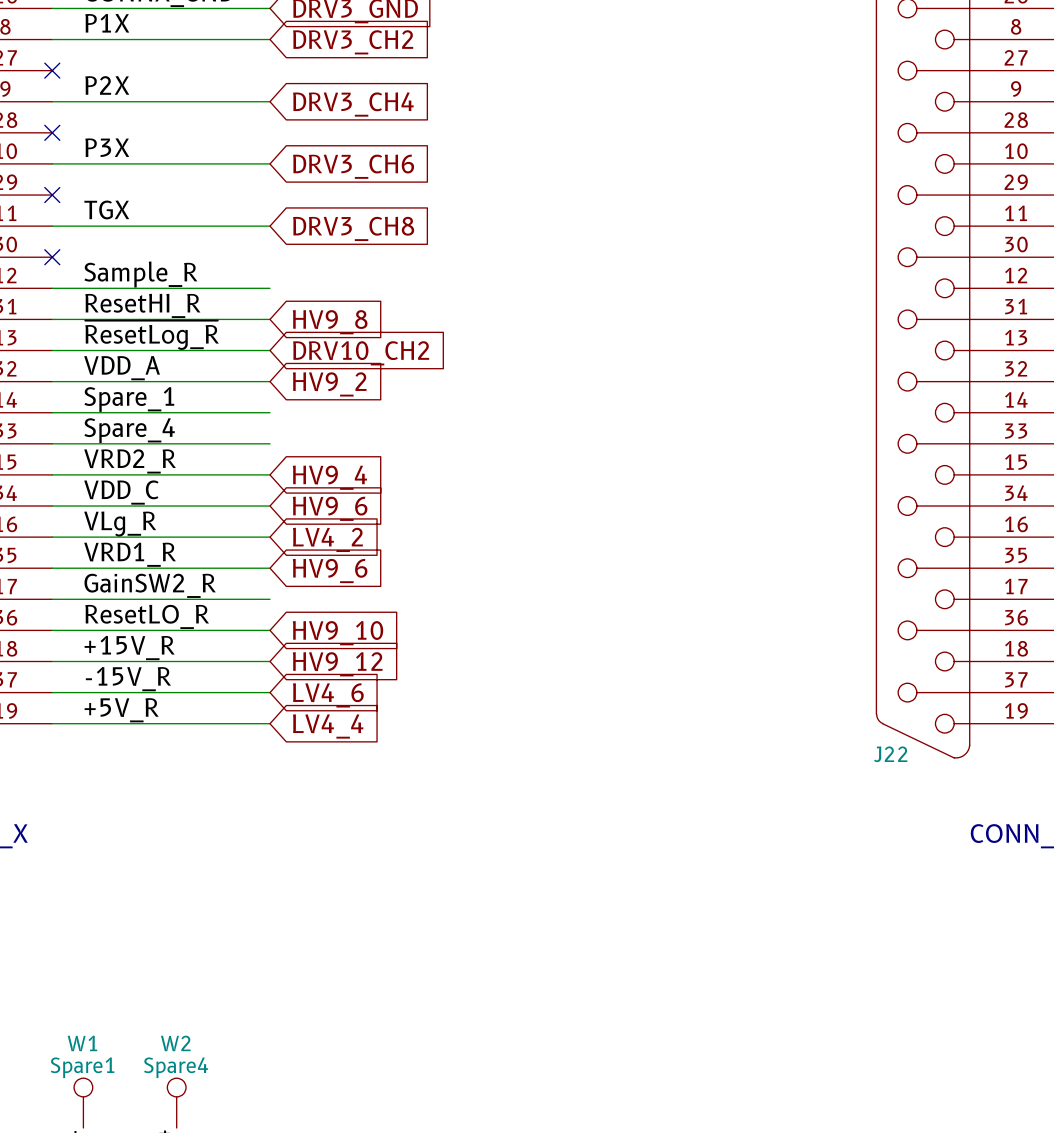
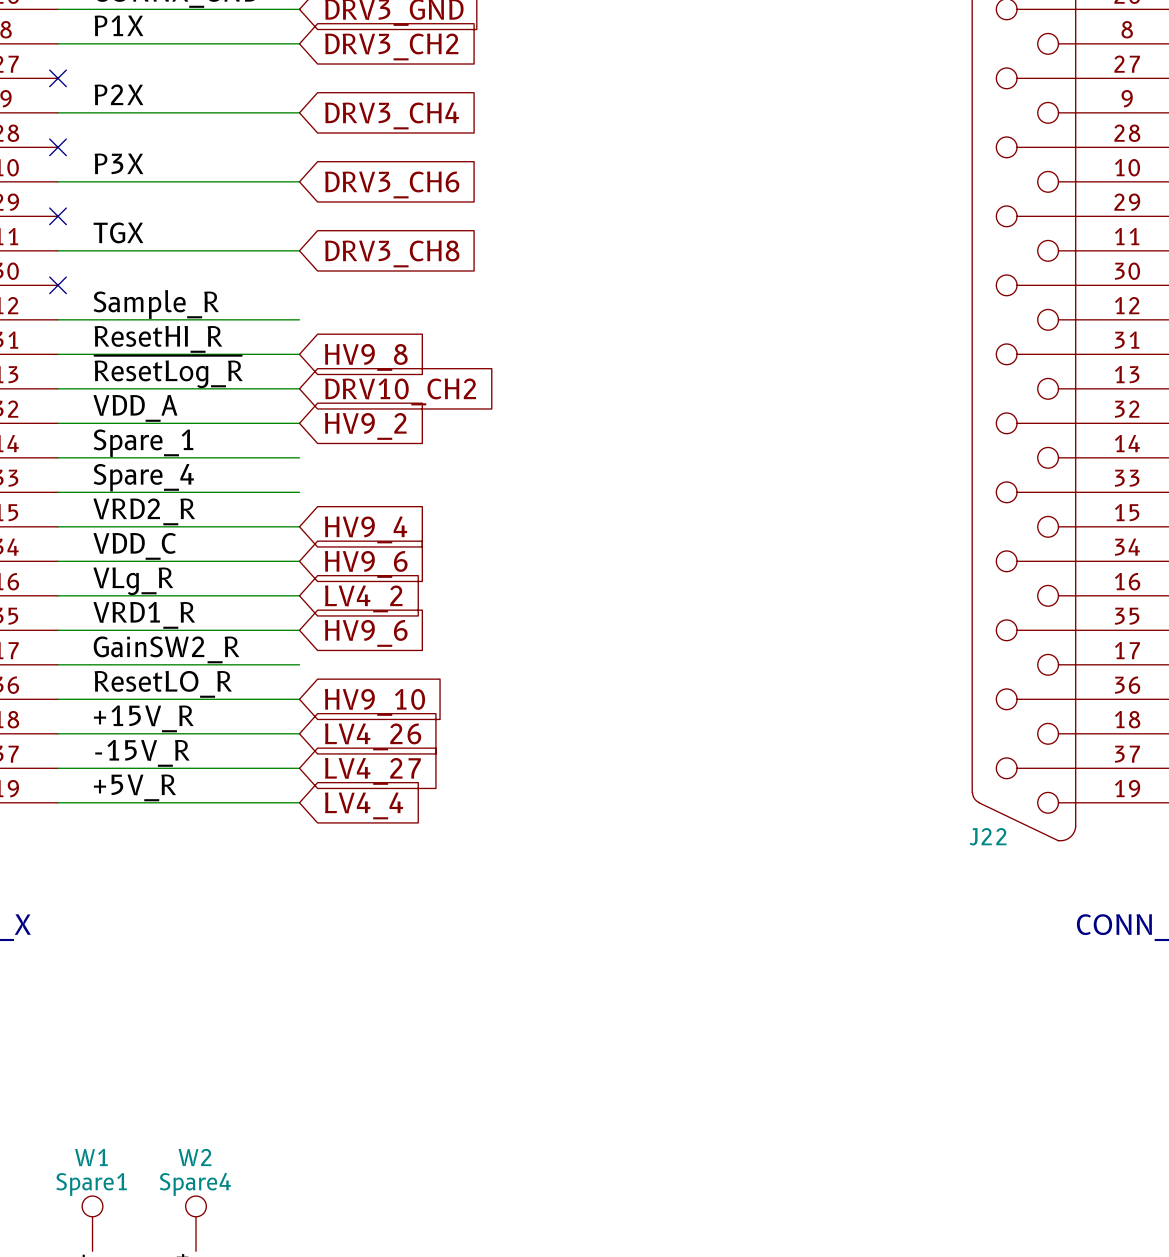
global label: HV9_12 (337, 664) -> LV4_26 (373, 736)
global label: LV4_6 (328, 695) -> LV4_27 (372, 771)

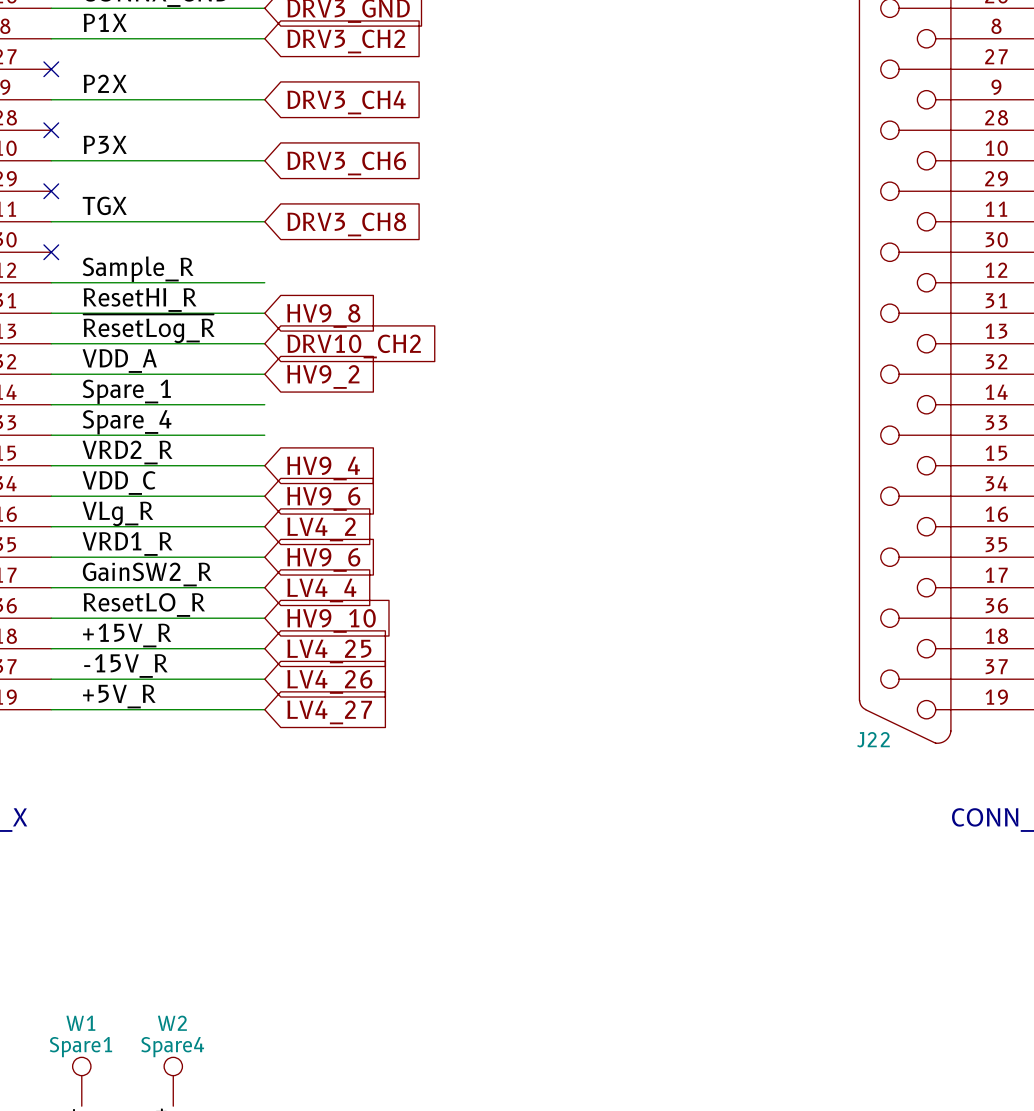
global label: none -> LV4_4 (321, 590)
global label: LV4_26 (373, 736) -> LV4_25 (329, 651)
global label: LV4_27 (372, 771) -> LV4_26 (329, 681)
global label: LV4_4 (364, 805) -> LV4_27 (329, 712)

